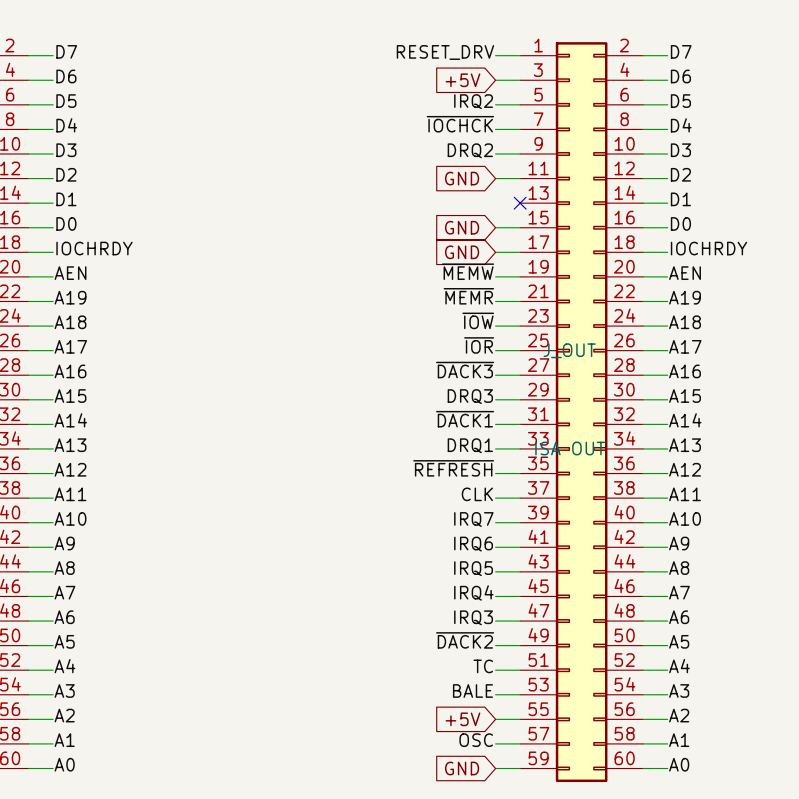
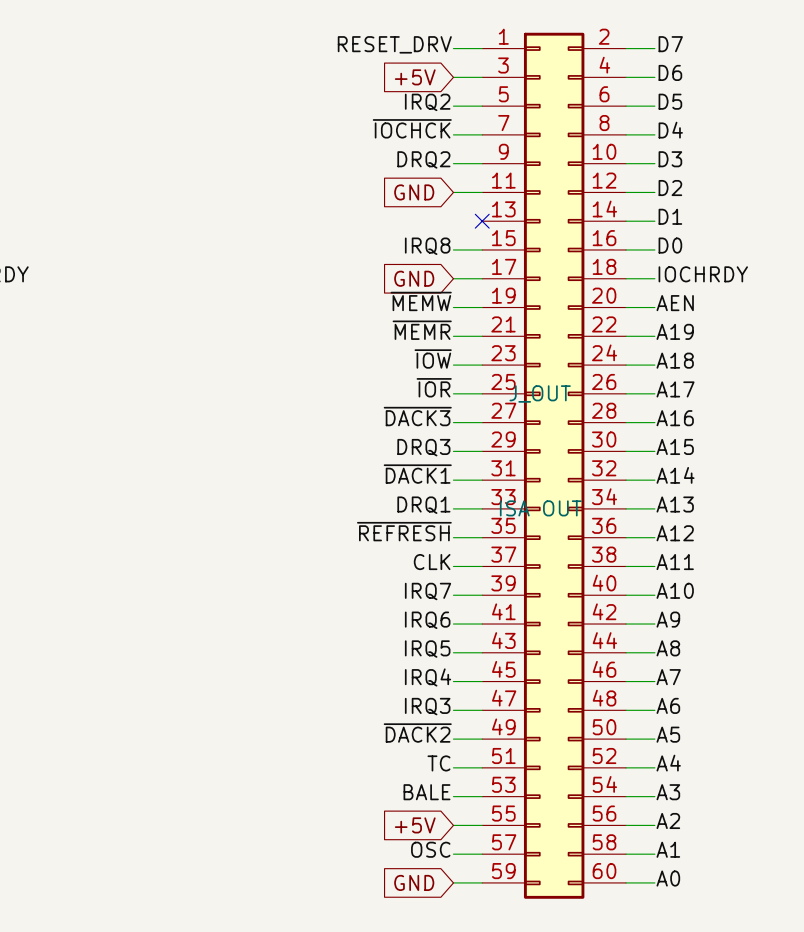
label: none -> IRQ8 (427, 246)
global label: GND (462, 227) -> none

